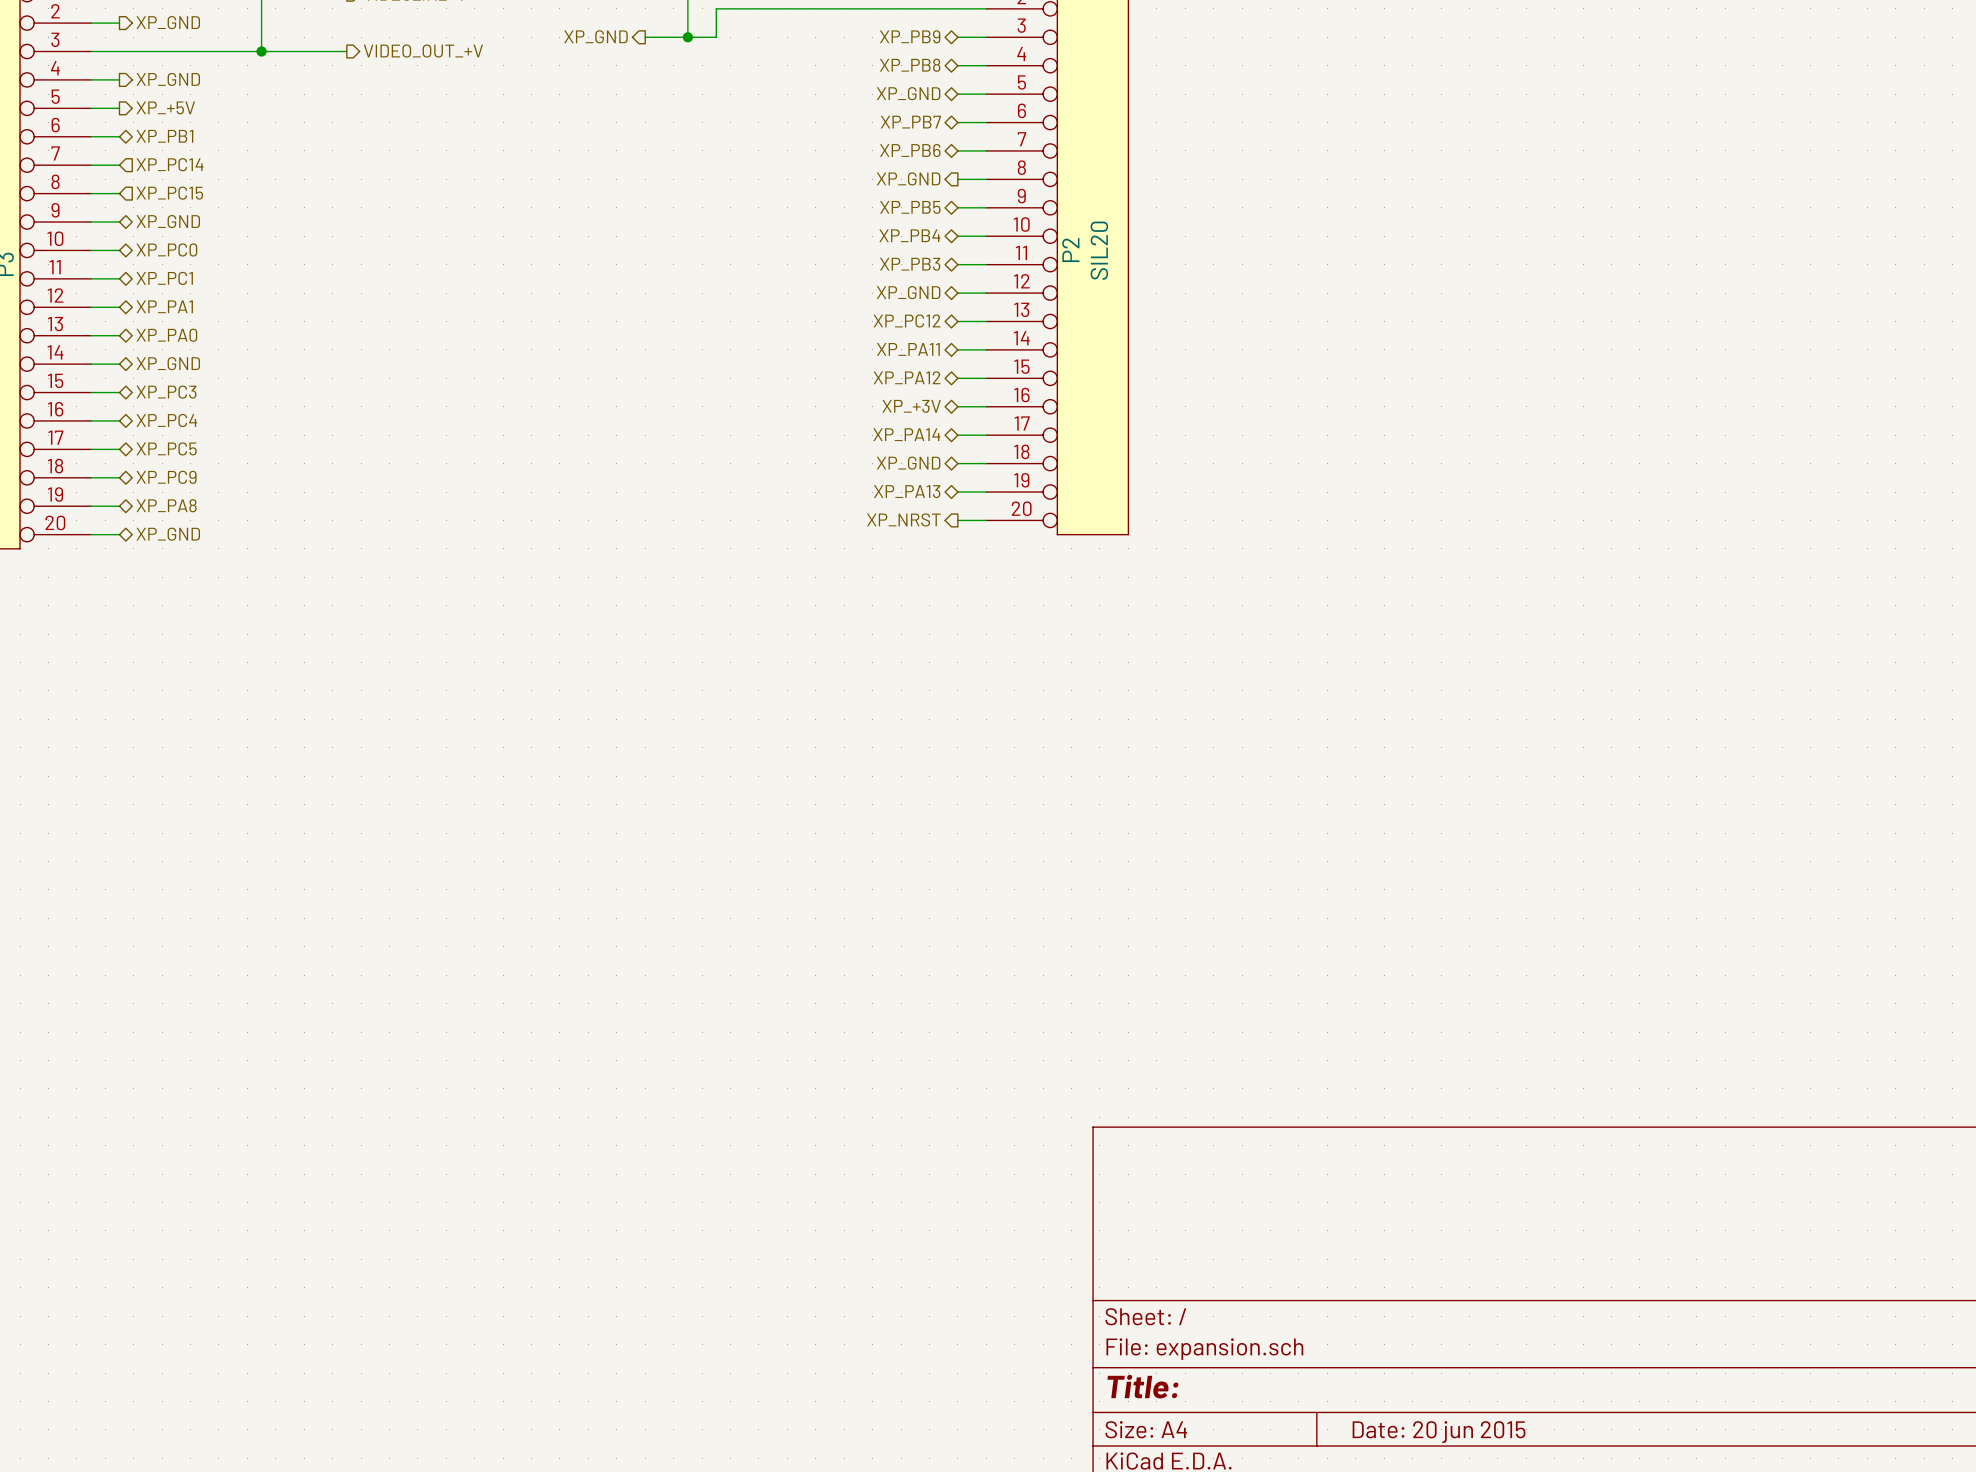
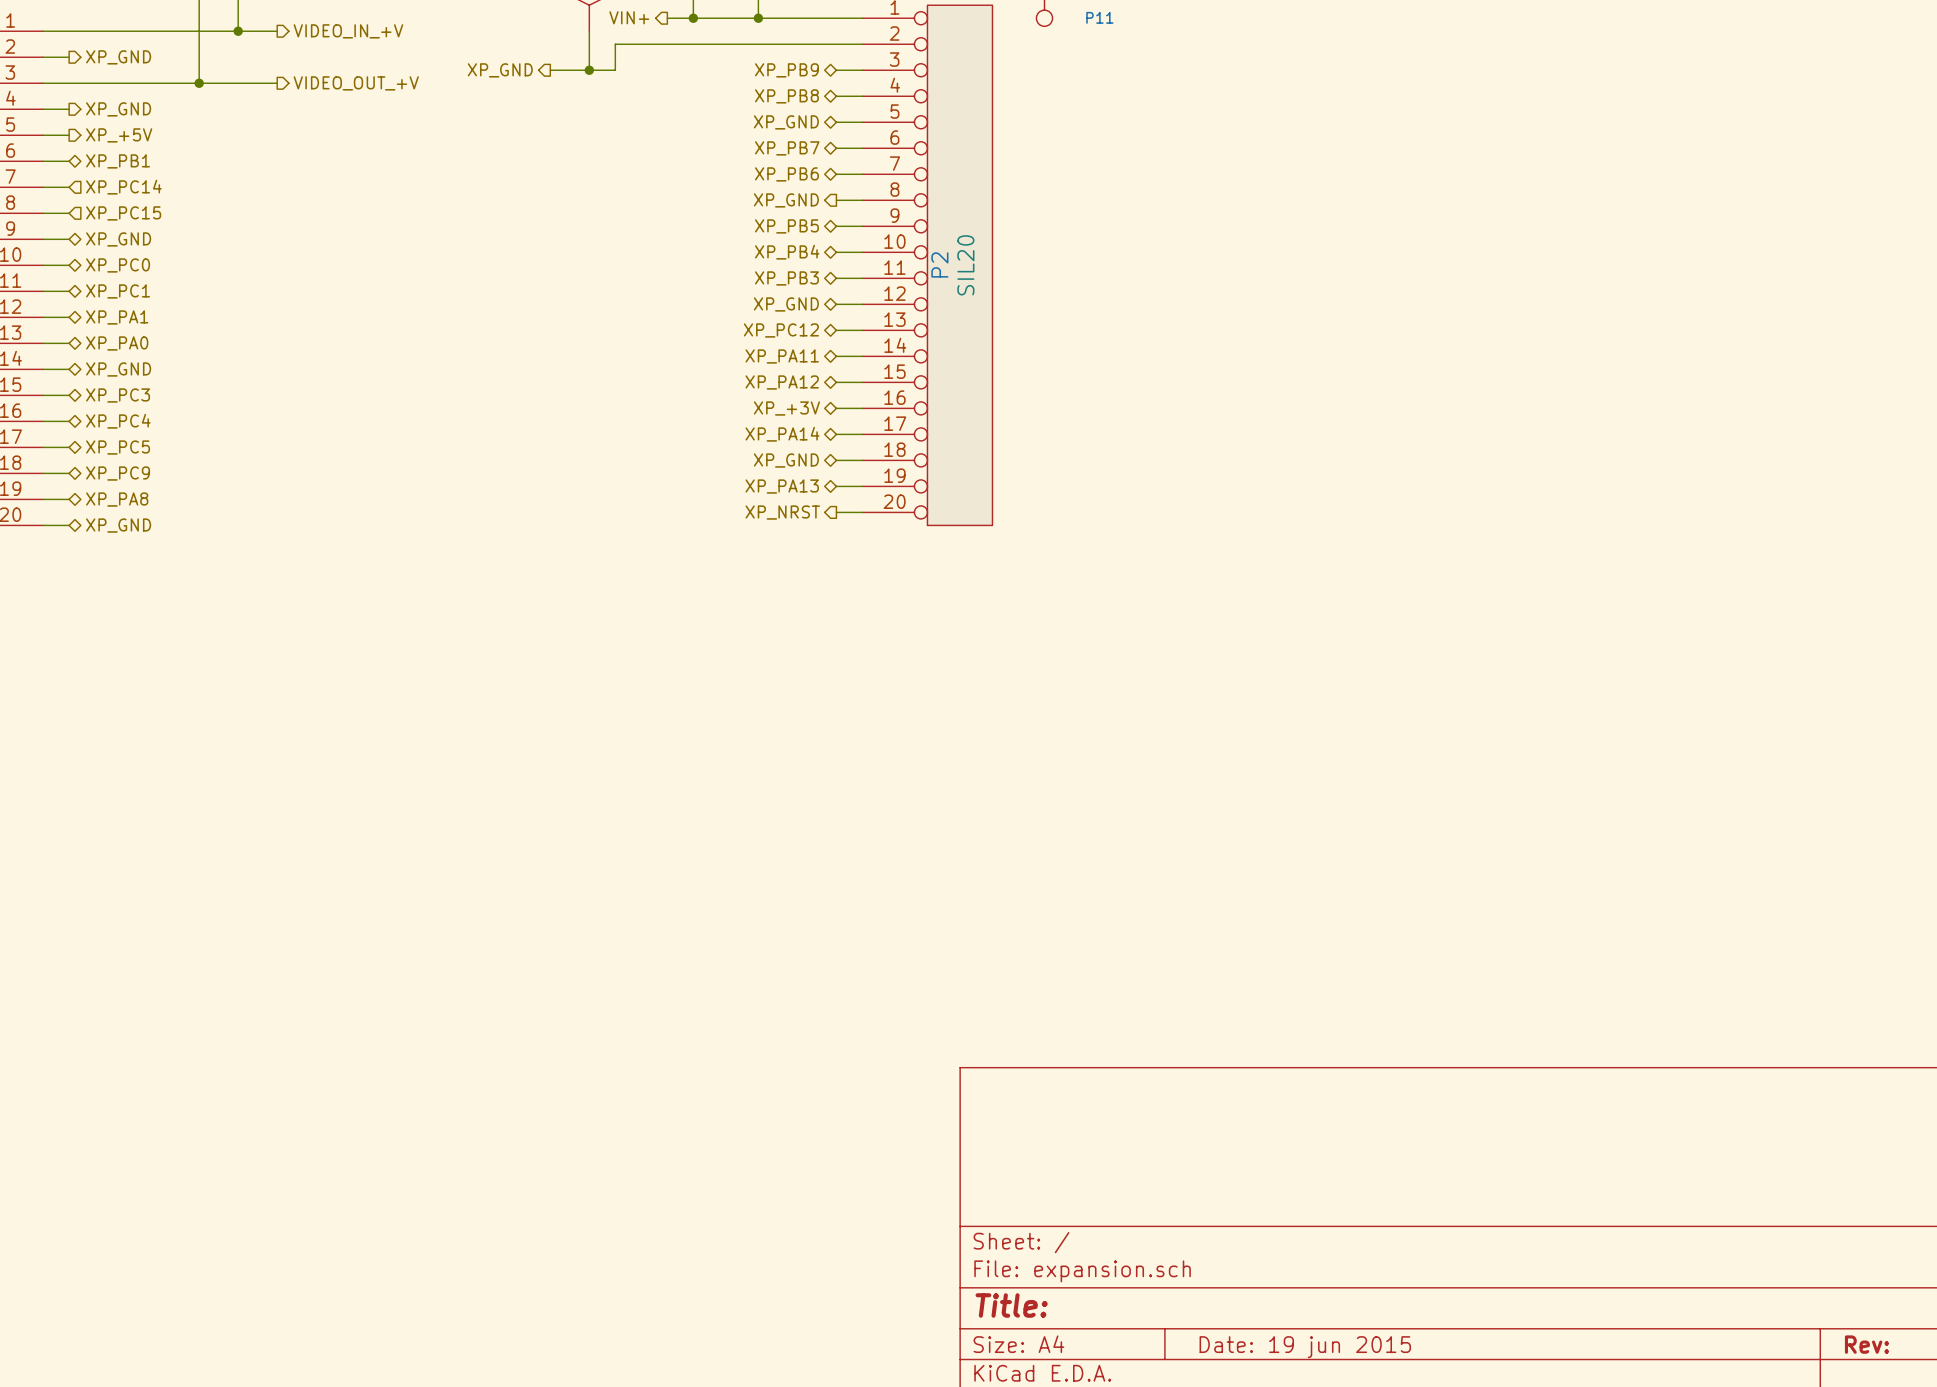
title block: Date: 20 jun 2015 (1439, 1432) -> Date: 19 jun 2015 (1305, 1347)

